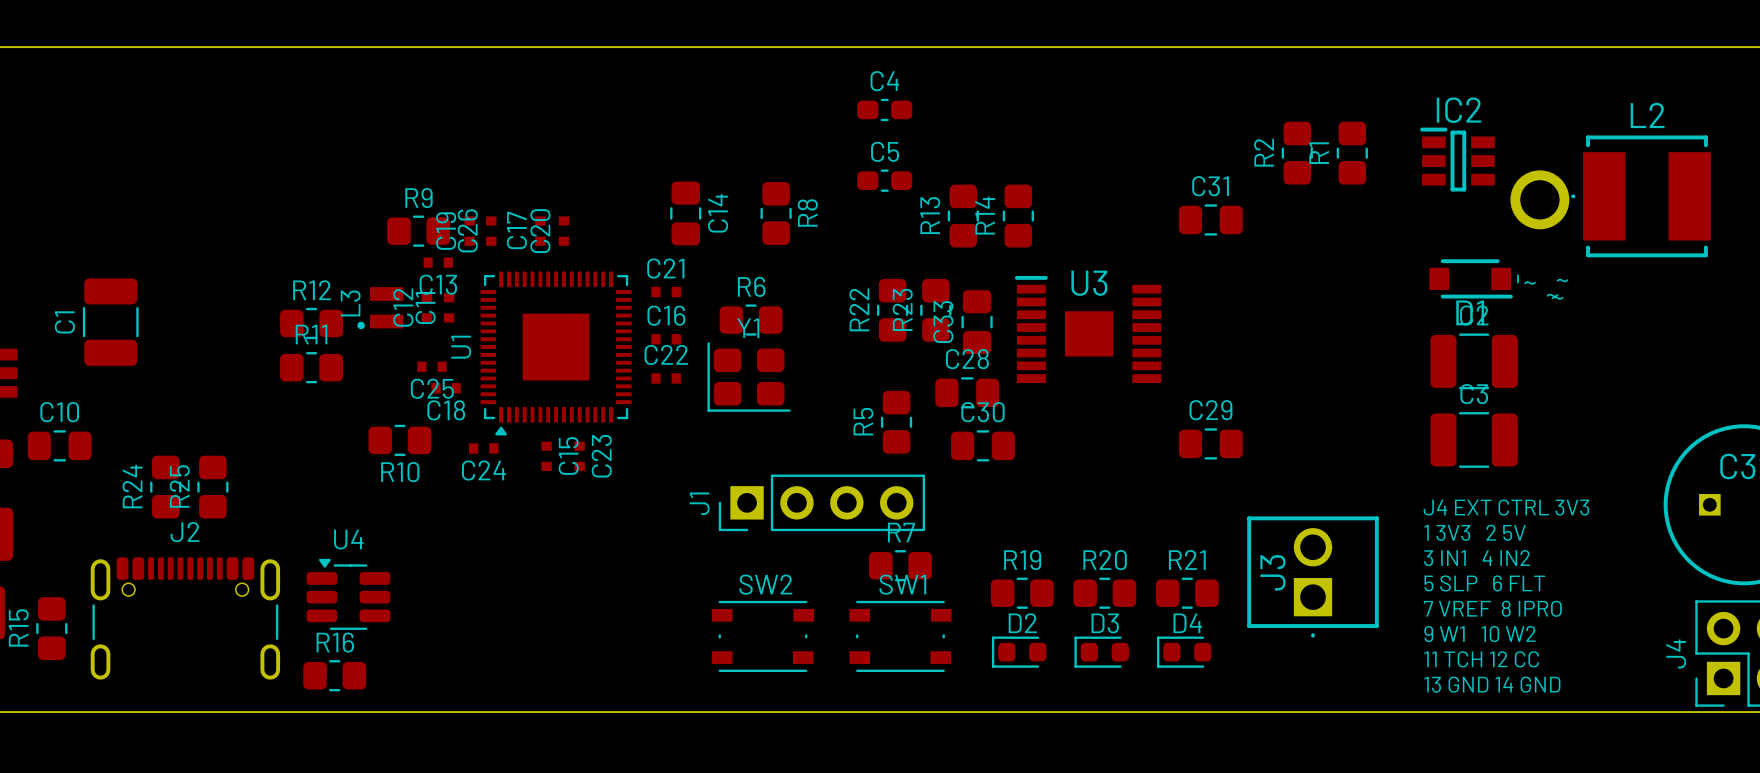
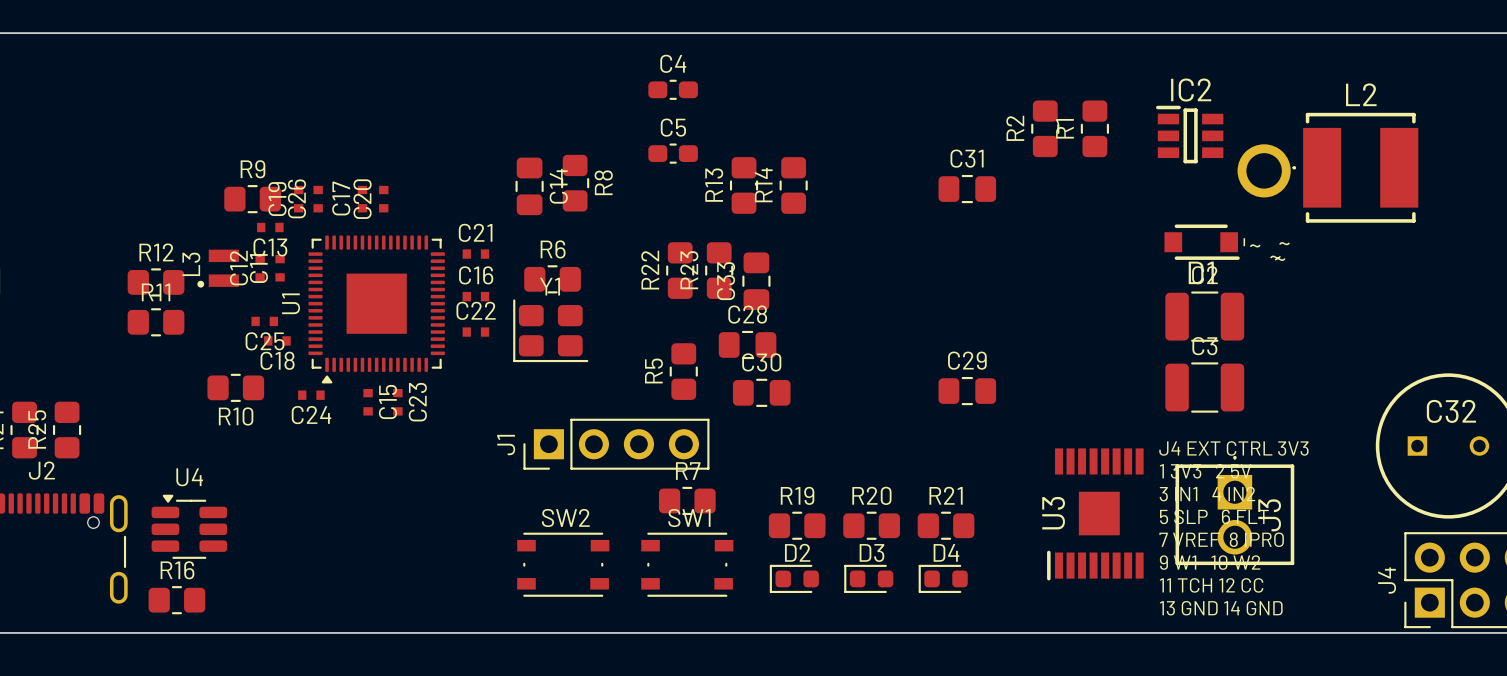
C14 position: (685, 213) -> (529, 186)
U3 rotation: 0° (1088, 329) -> 90° counterclockwise (1095, 514)
U3 position: (1088, 329) -> (1095, 514)
J3 rotation: 0° (1313, 576) -> 180° (1234, 510)
J3 position: (1313, 576) -> (1234, 510)

